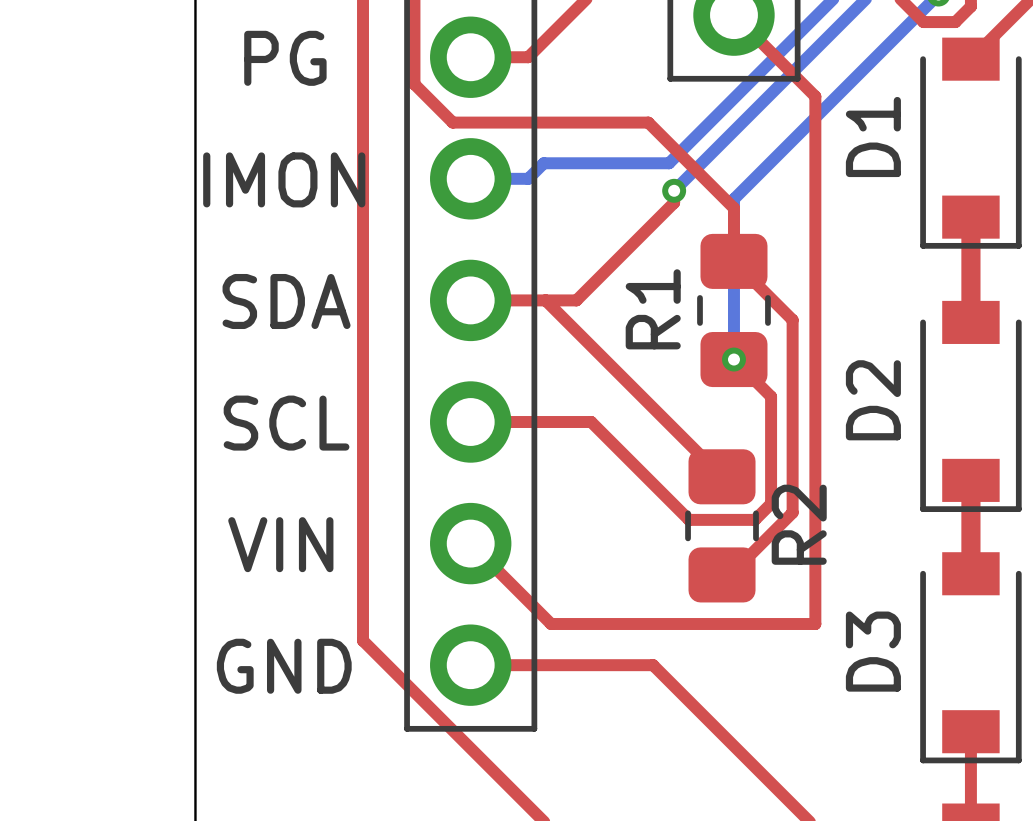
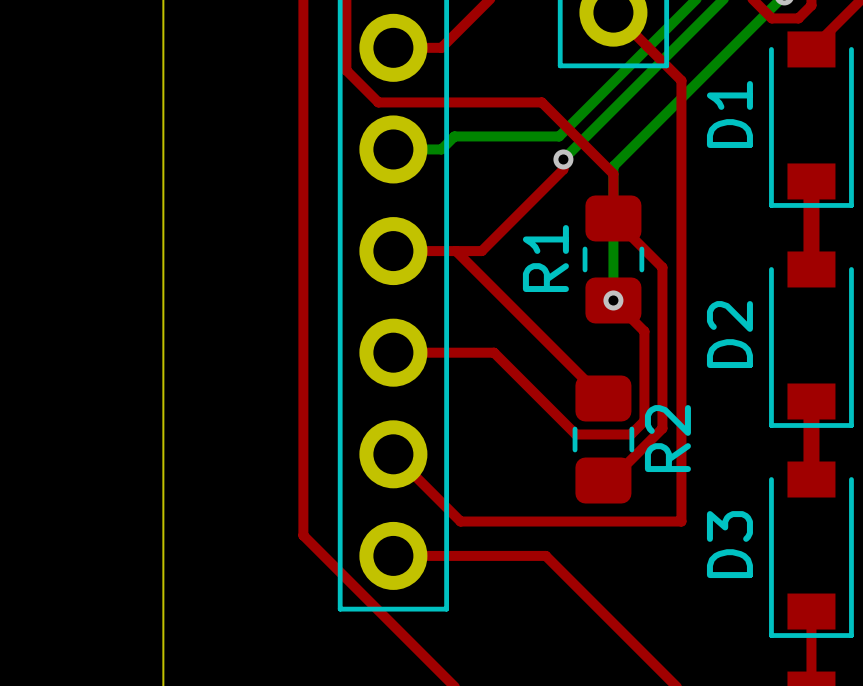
text: PG (285, 58) -> none
text: IMON (284, 179) -> none
text: SDA (286, 301) -> none
text: SCL (286, 423) -> none
text: VIN (280, 544) -> none
text: GND (284, 666) -> none

